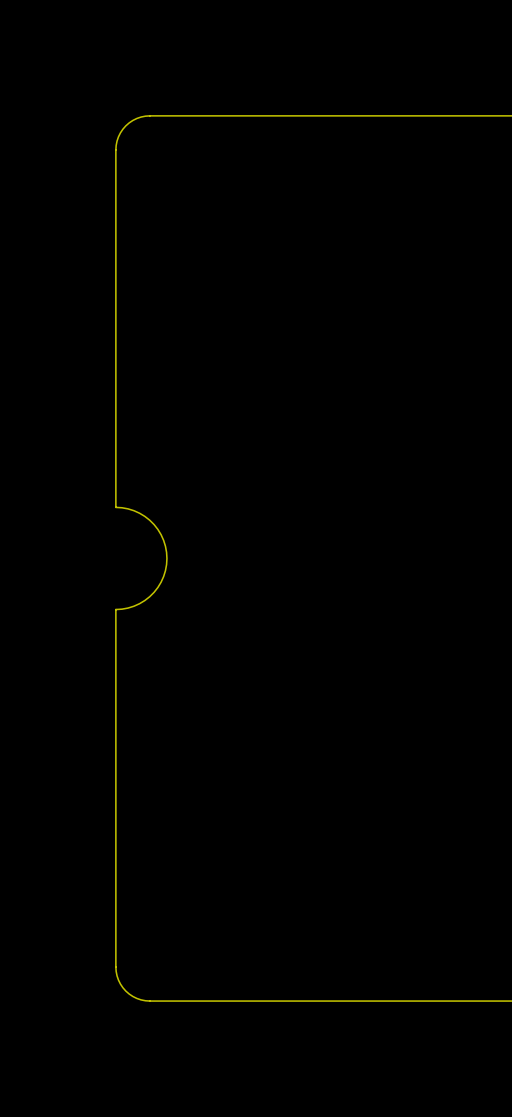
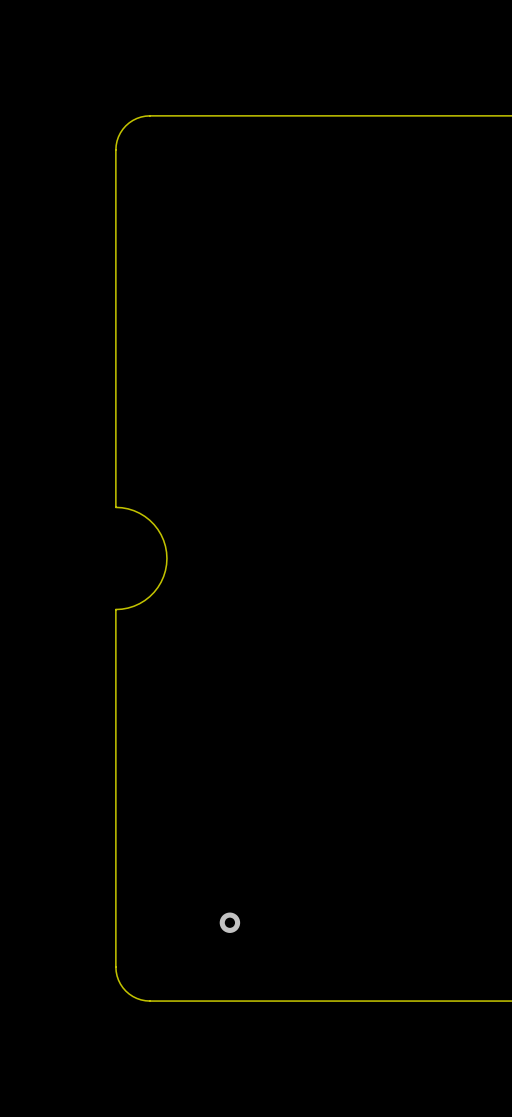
via: none -> (229, 922)

